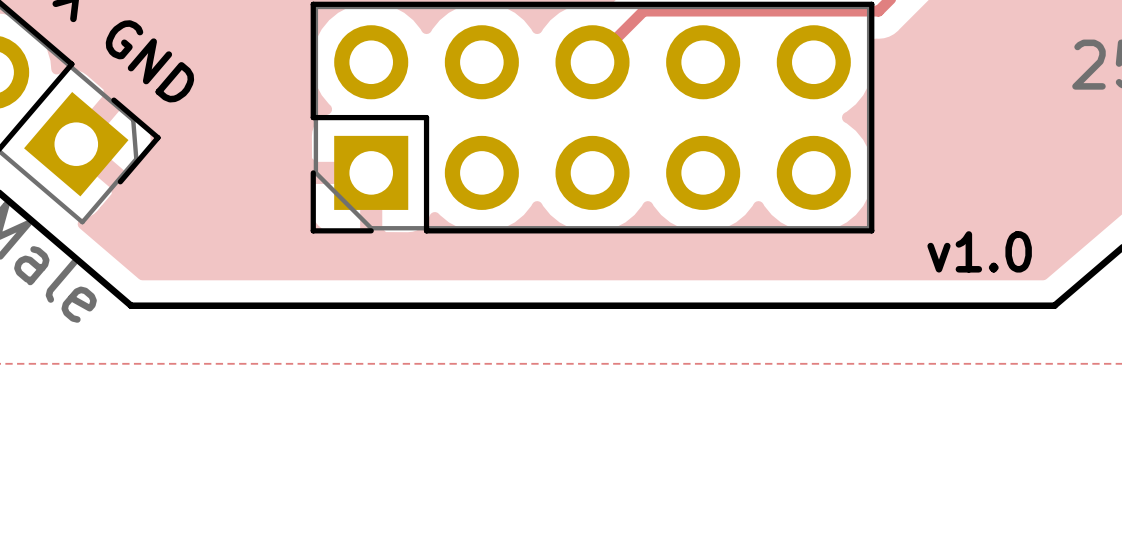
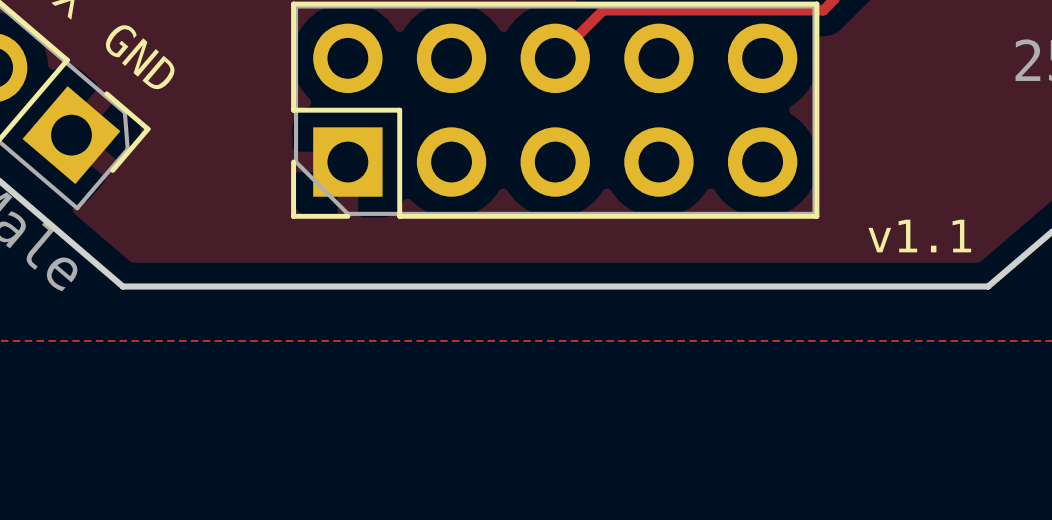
text: v1.0 (979, 251) -> v1.1 (919, 236)

